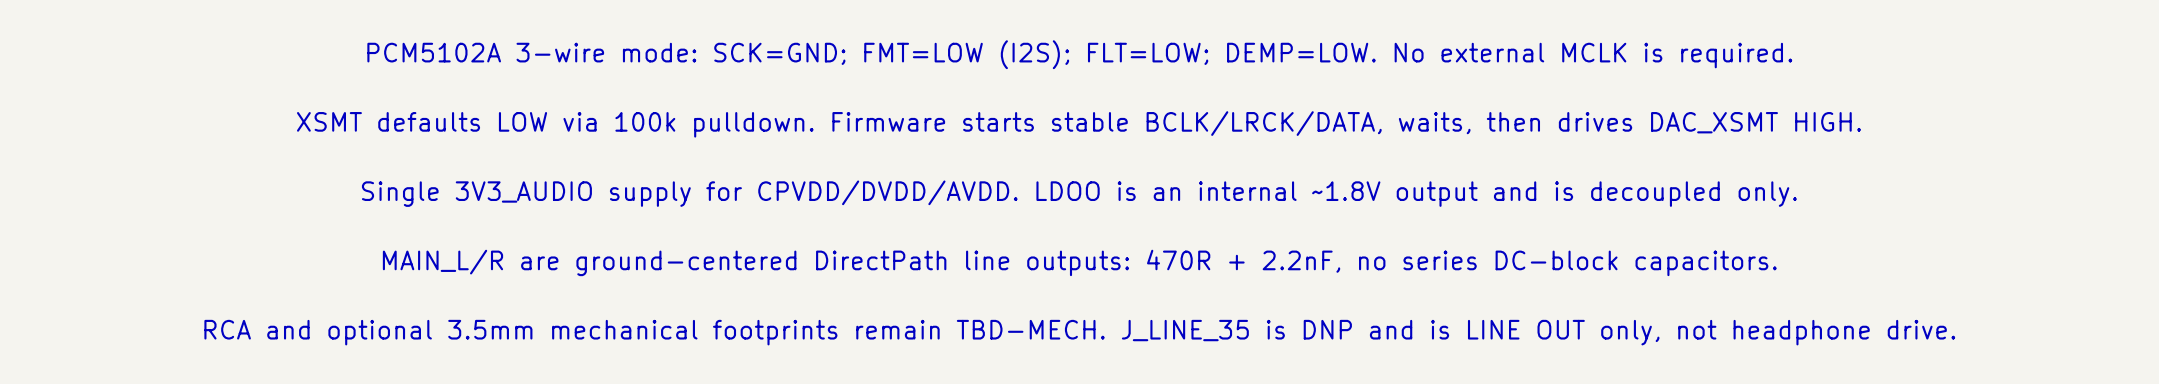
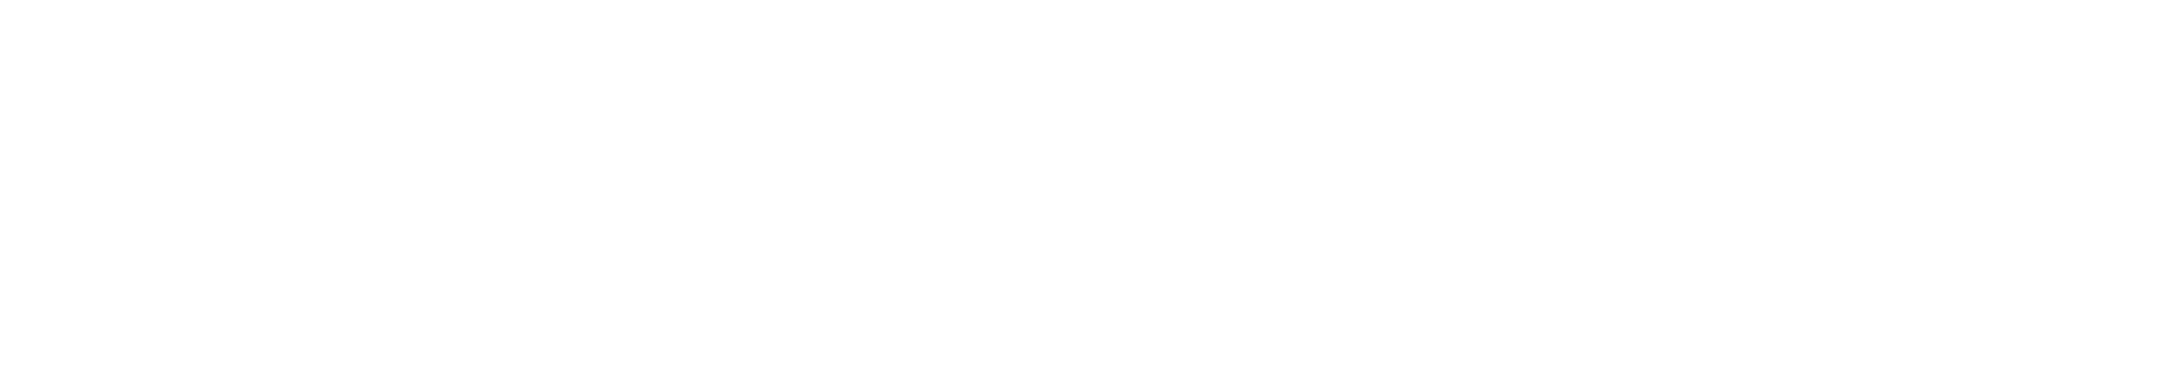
text: PCM5102A 3-wire mode: SCK=GND; FMT=LOW (I2S); FLT=LOW; DEMP=LOW. No external MCLK is required. (1079, 54) -> none
text: XSMT defaults LOW via 100k pulldown. Firmware starts stable BCLK/LRCK/DATA, waits, then drives DAC_XSMT HIGH. (1078, 124) -> none
text: Single 3V3_AUDIO supply for CPVDD/DVDD/AVDD. LDOO is an internal ~1.8V output and is decoupled only. (1079, 193) -> none
text: MAIN_L/R are ground-centered DirectPath line outputs: 470R + 2.2nF, no series DC-block capacitors. (1079, 262) -> none
text: RCA and optional 3.5mm mechanical footprints remain TBD-MECH. J_LINE_35 is DNP and is LINE OUT only, not headphone drive. (1079, 332) -> none

